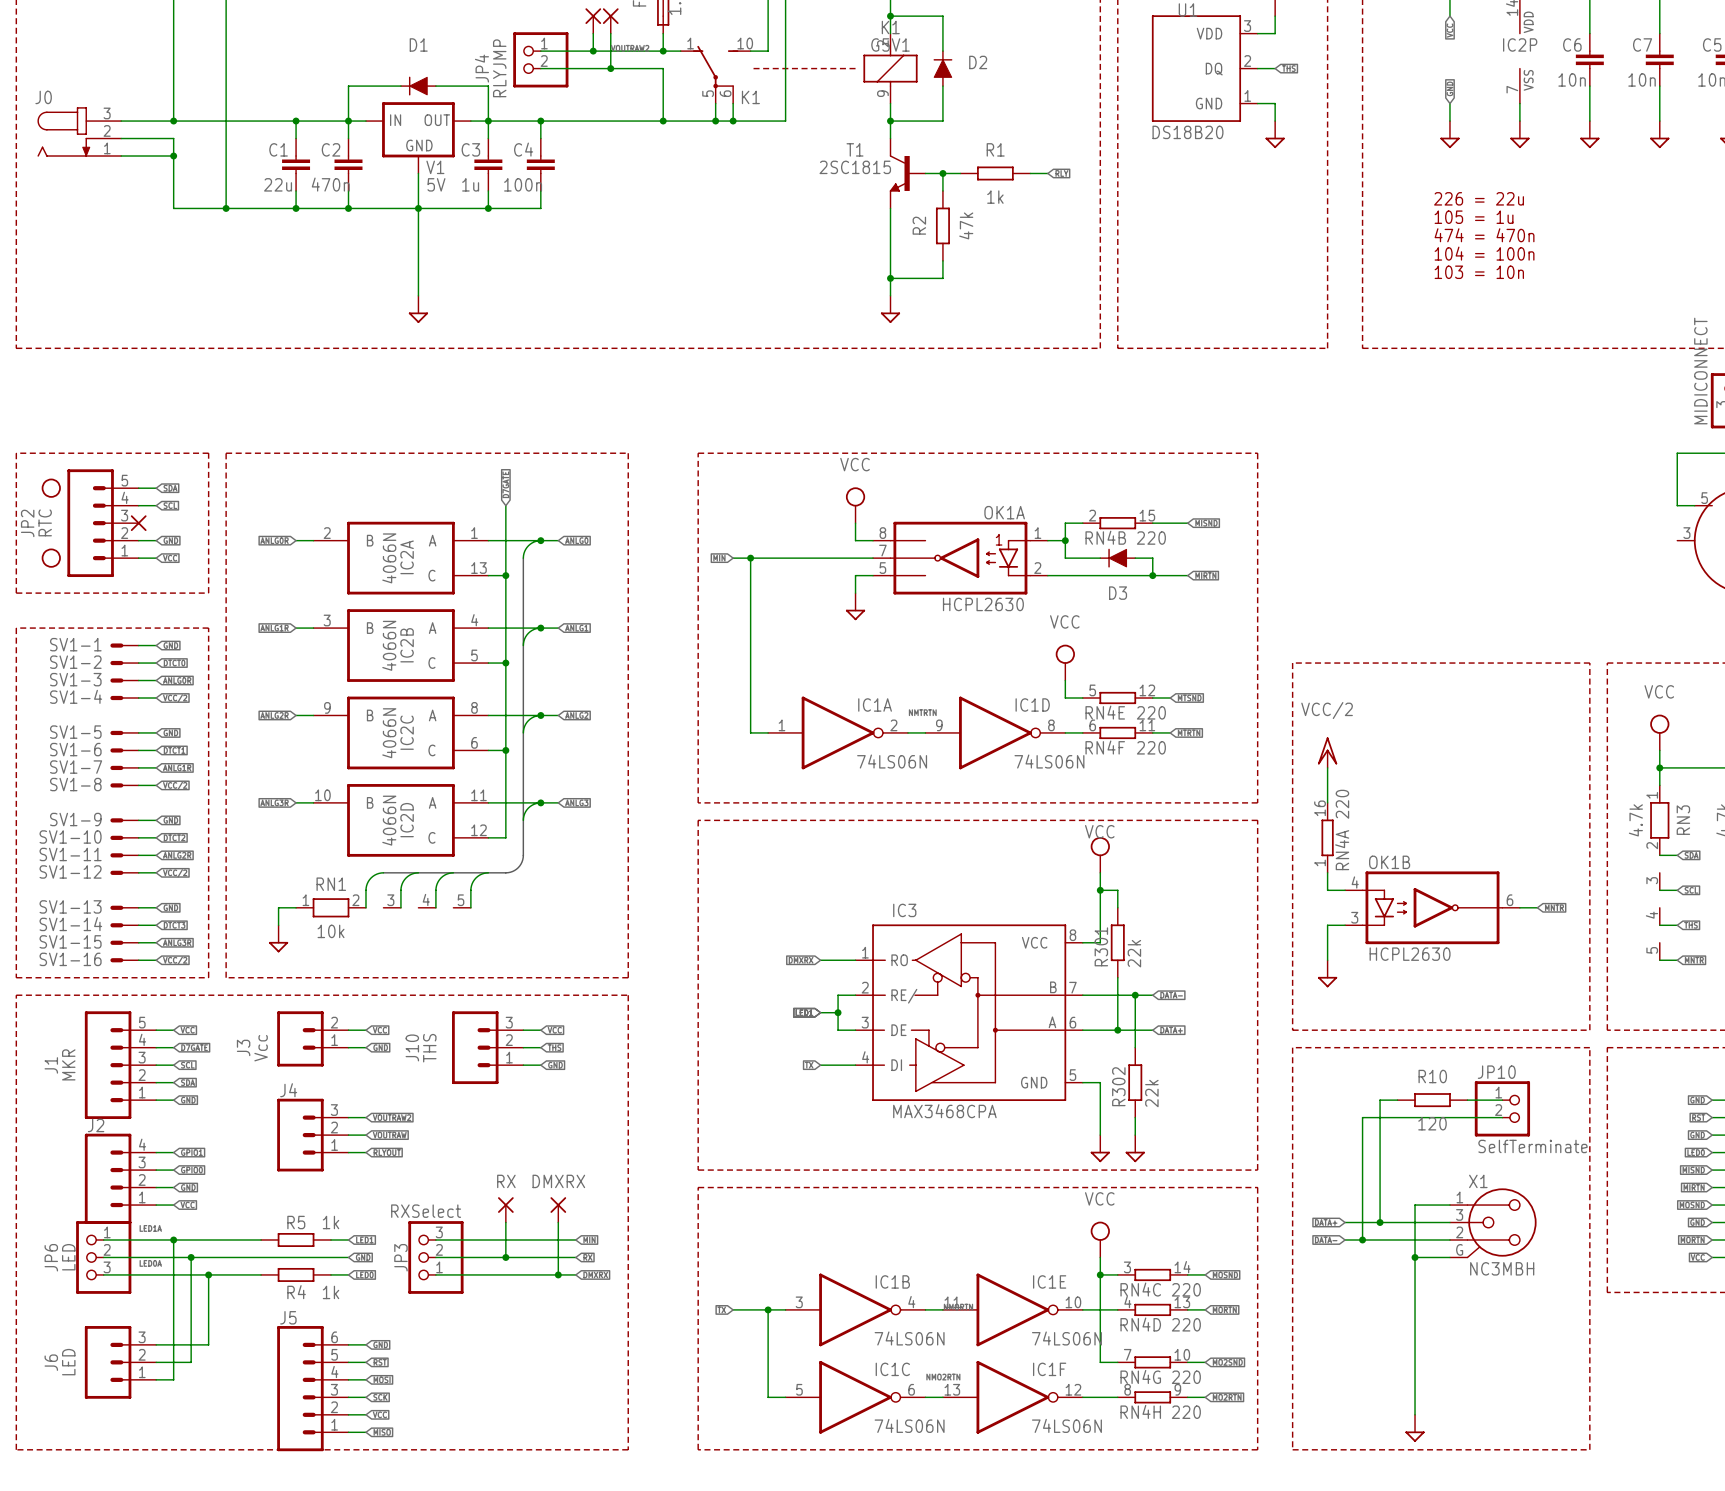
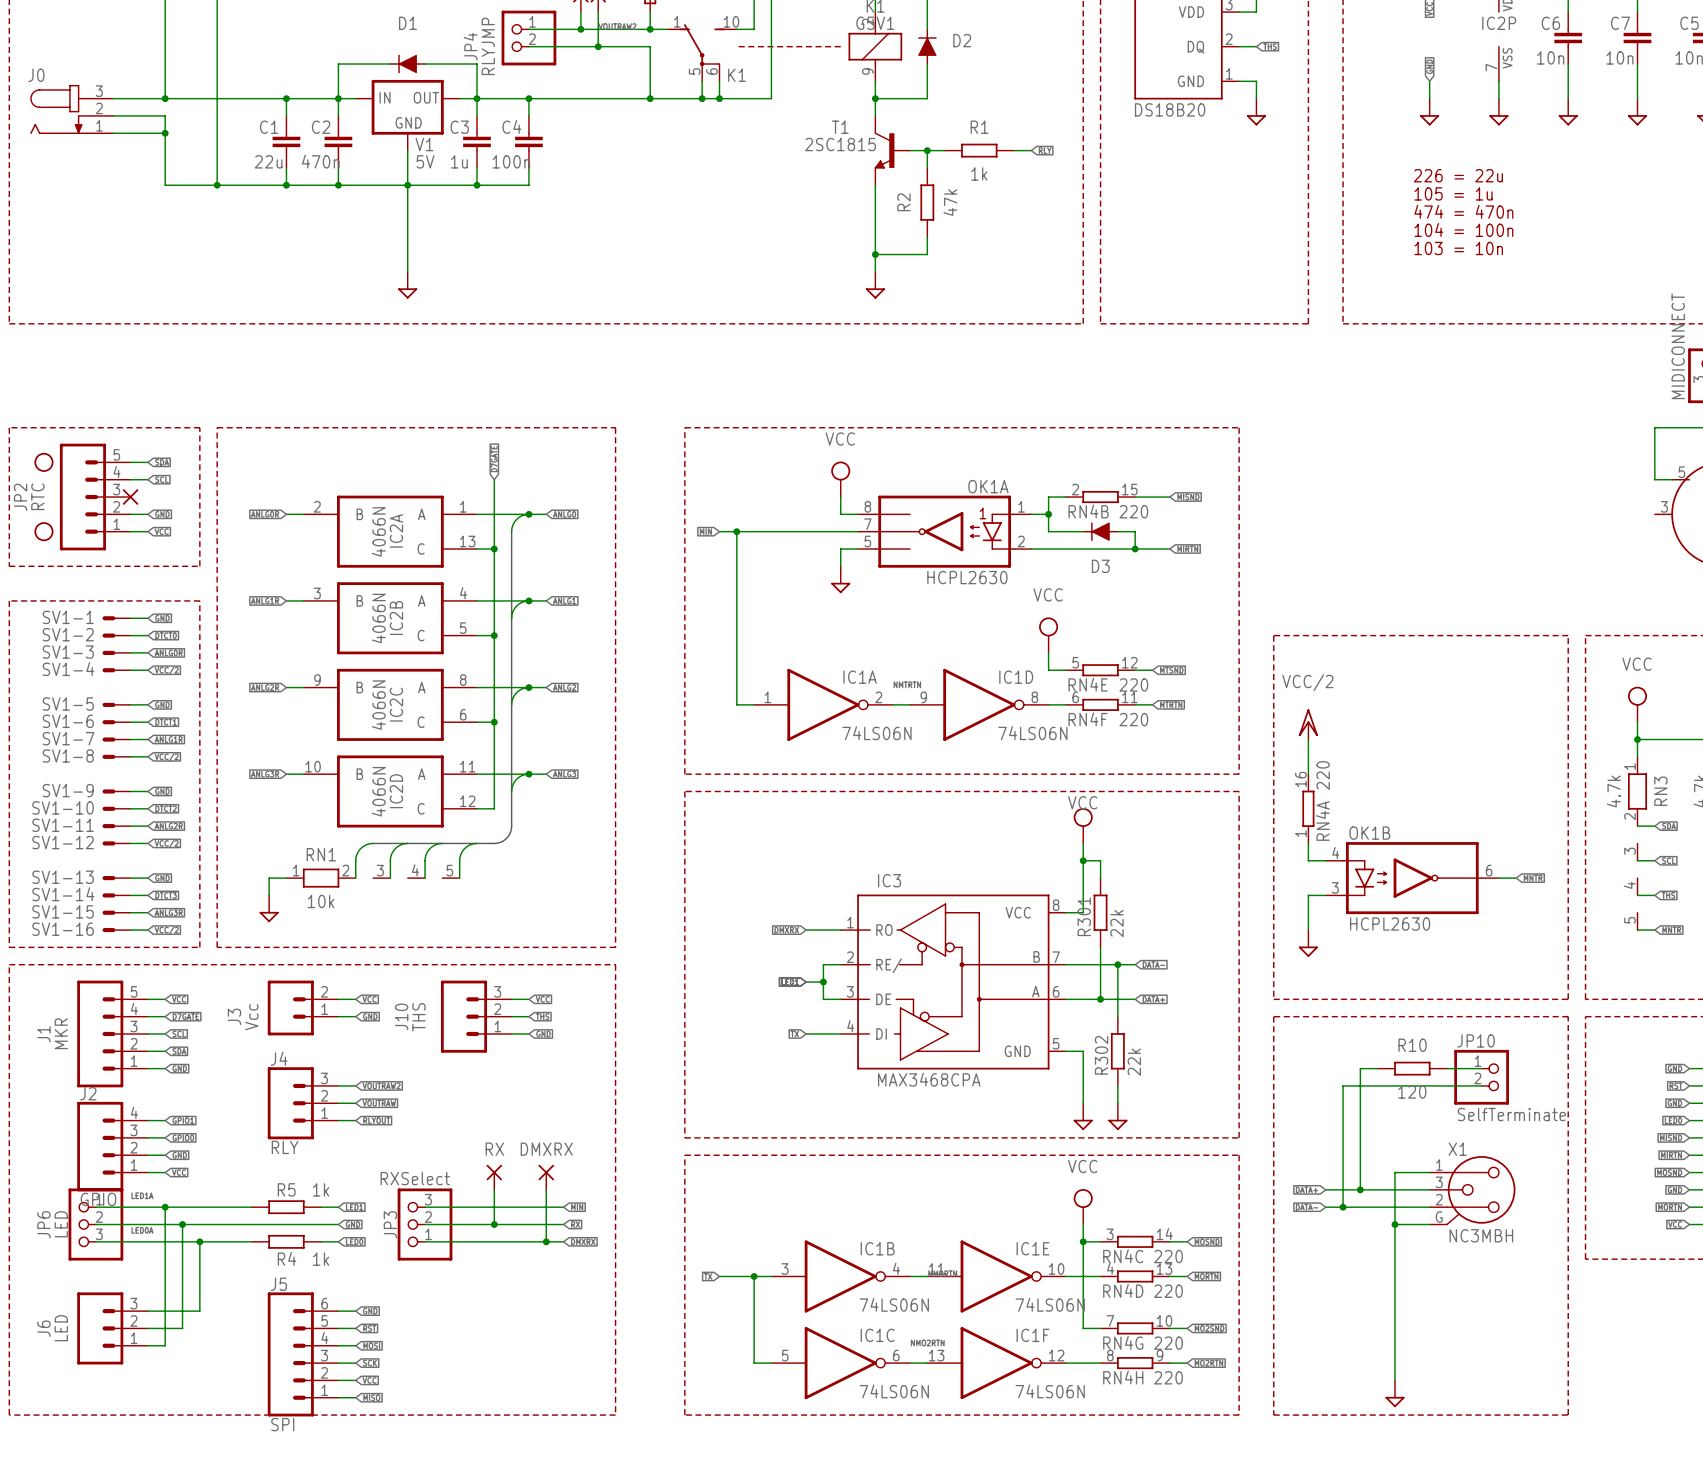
J4 value: none -> RLY (285, 1147)
J2 value: none -> GPIO (98, 1199)
J5 value: none -> SPI (282, 1424)

